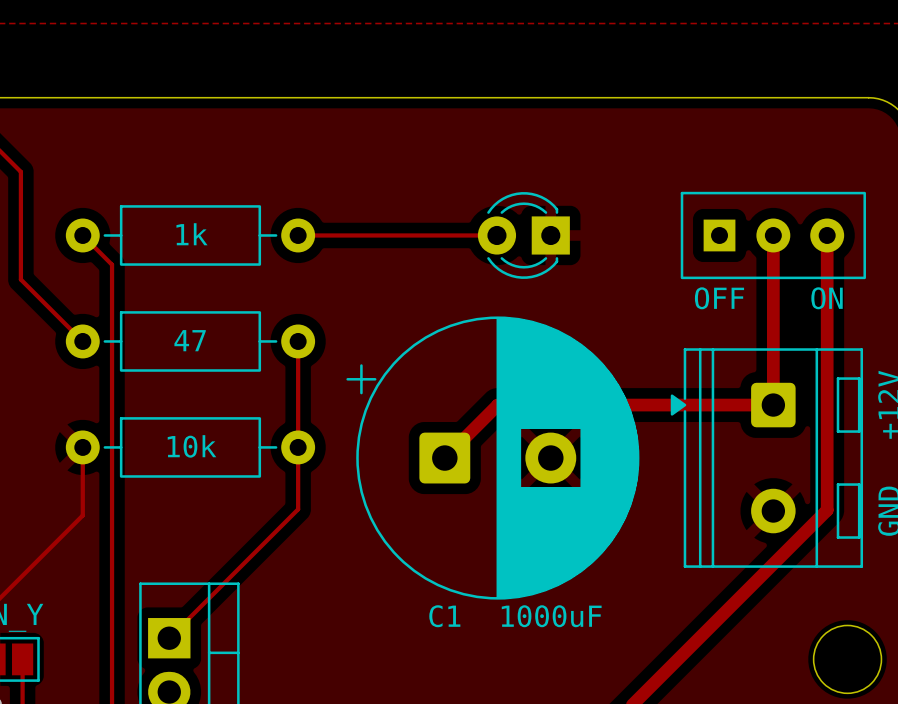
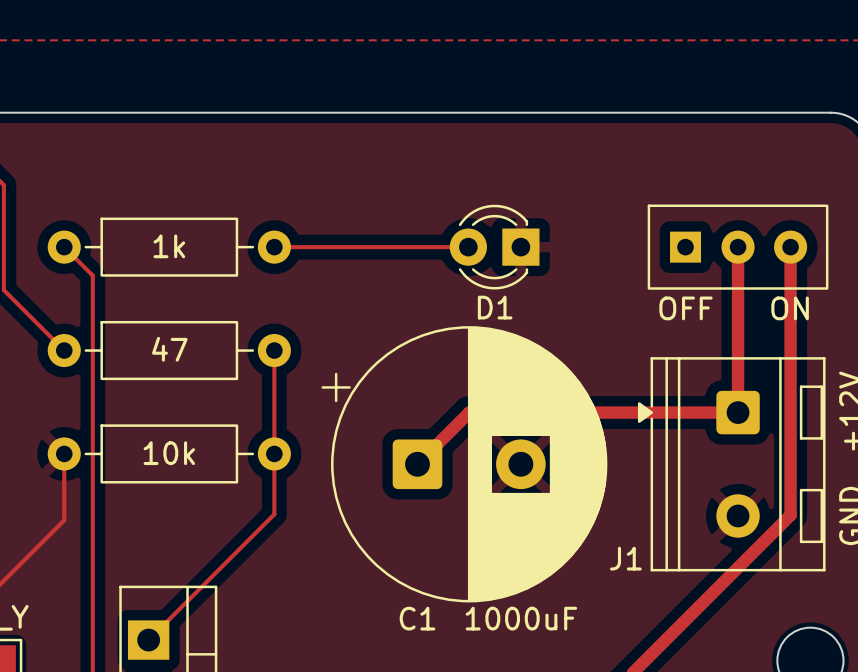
D1 name: none -> D1 (495, 307)
J1 name: none -> J1 (625, 558)

